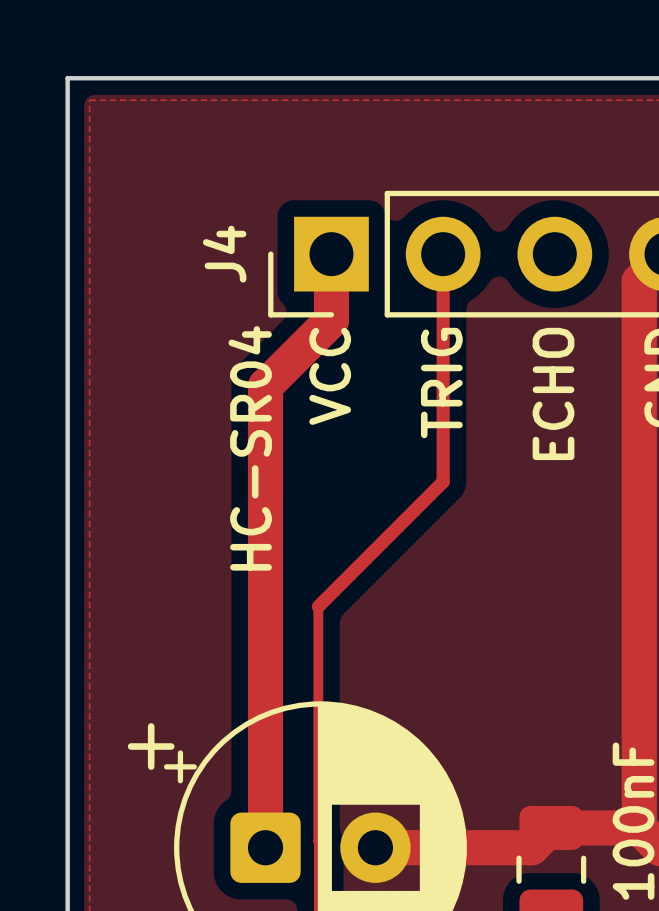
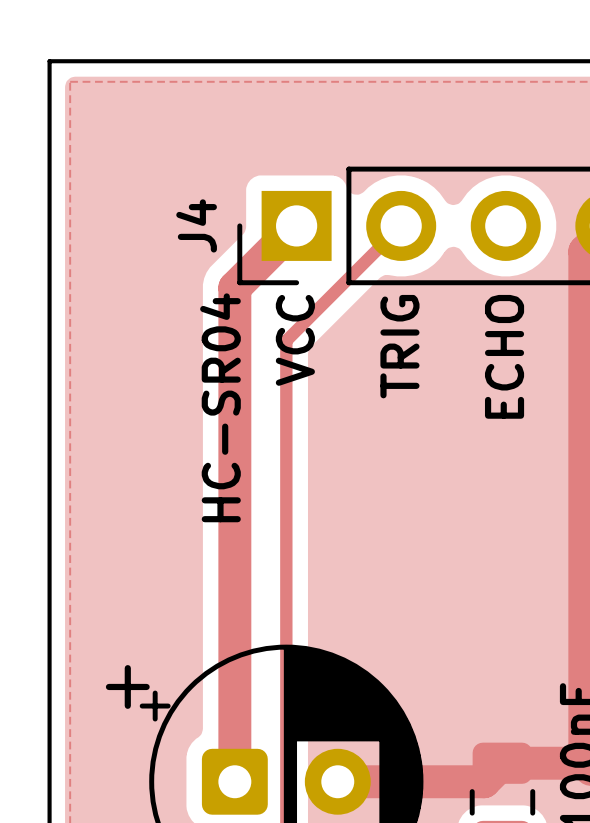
track: (331, 254) (331, 320) (265, 386) -> (296, 225) (234, 287) (234, 349)
track: (443, 254) (443, 481) (318, 606) (318, 841) (320, 843) -> (401, 225) (286, 340) (286, 777)

